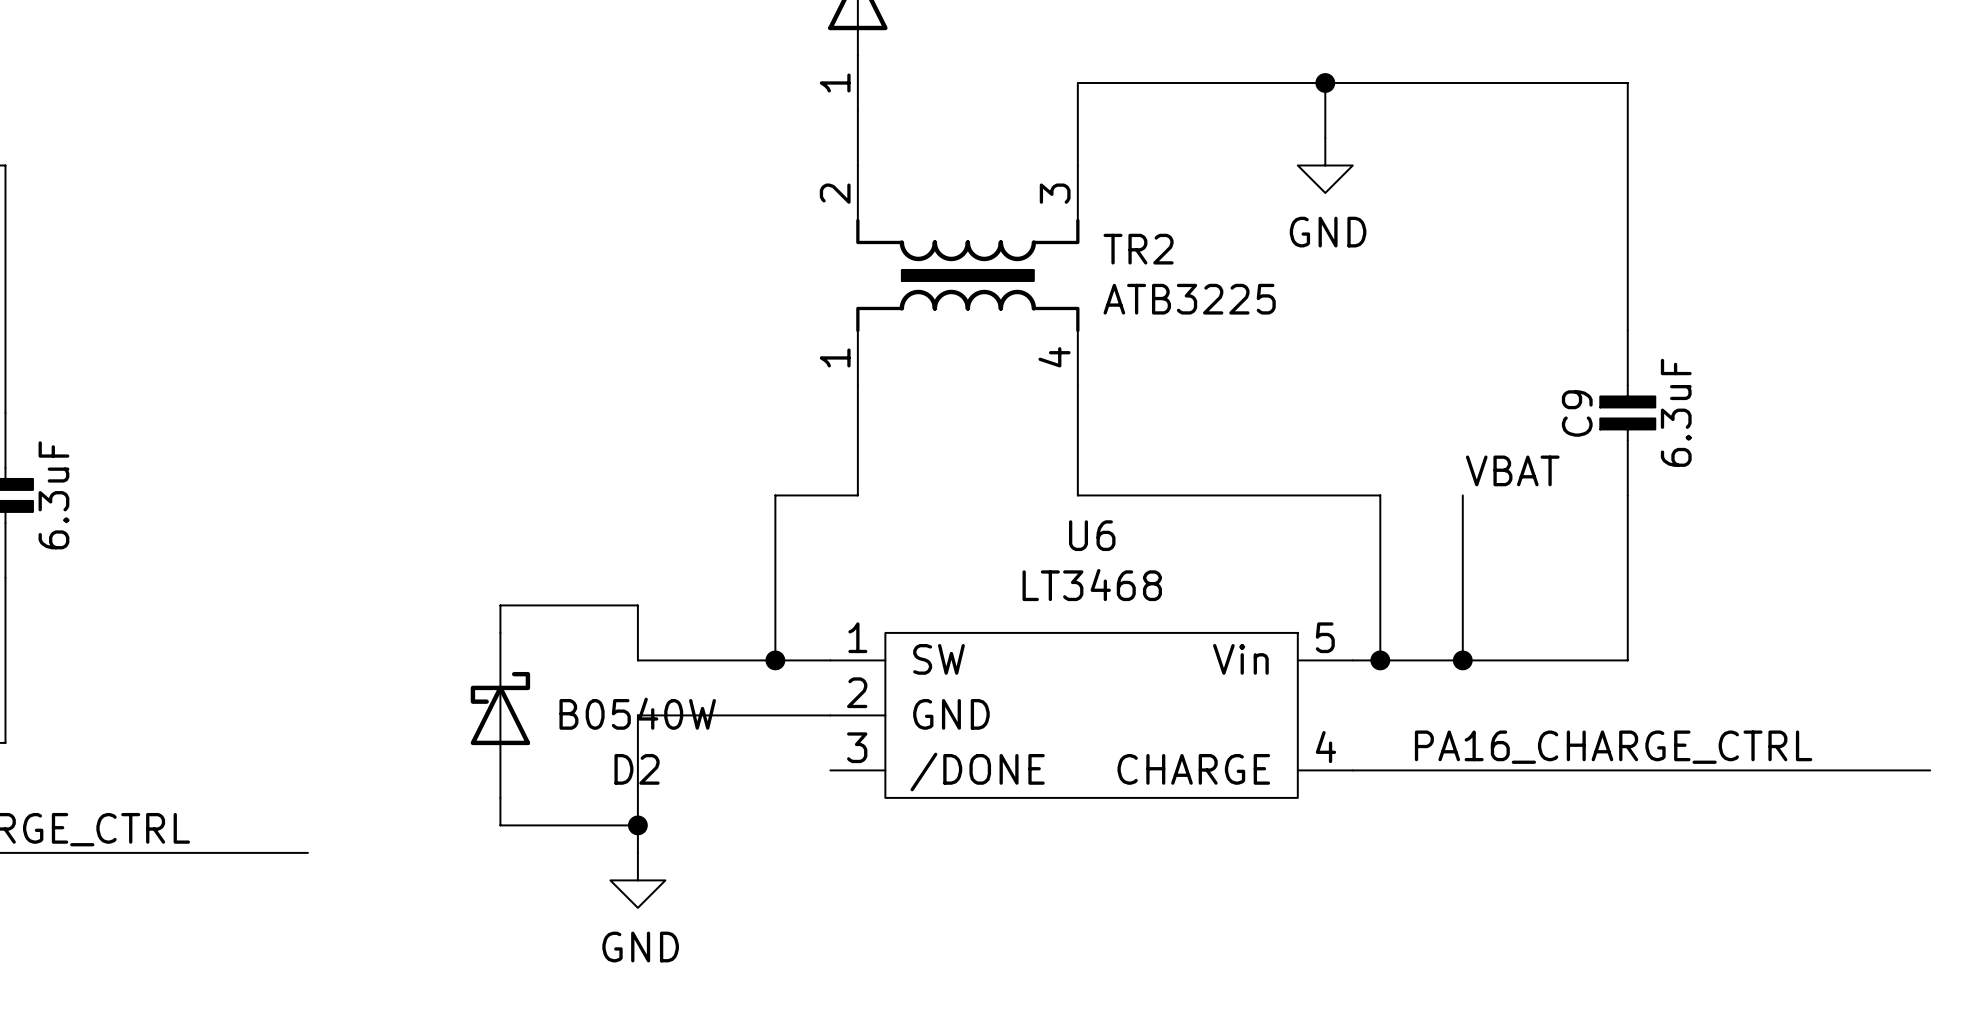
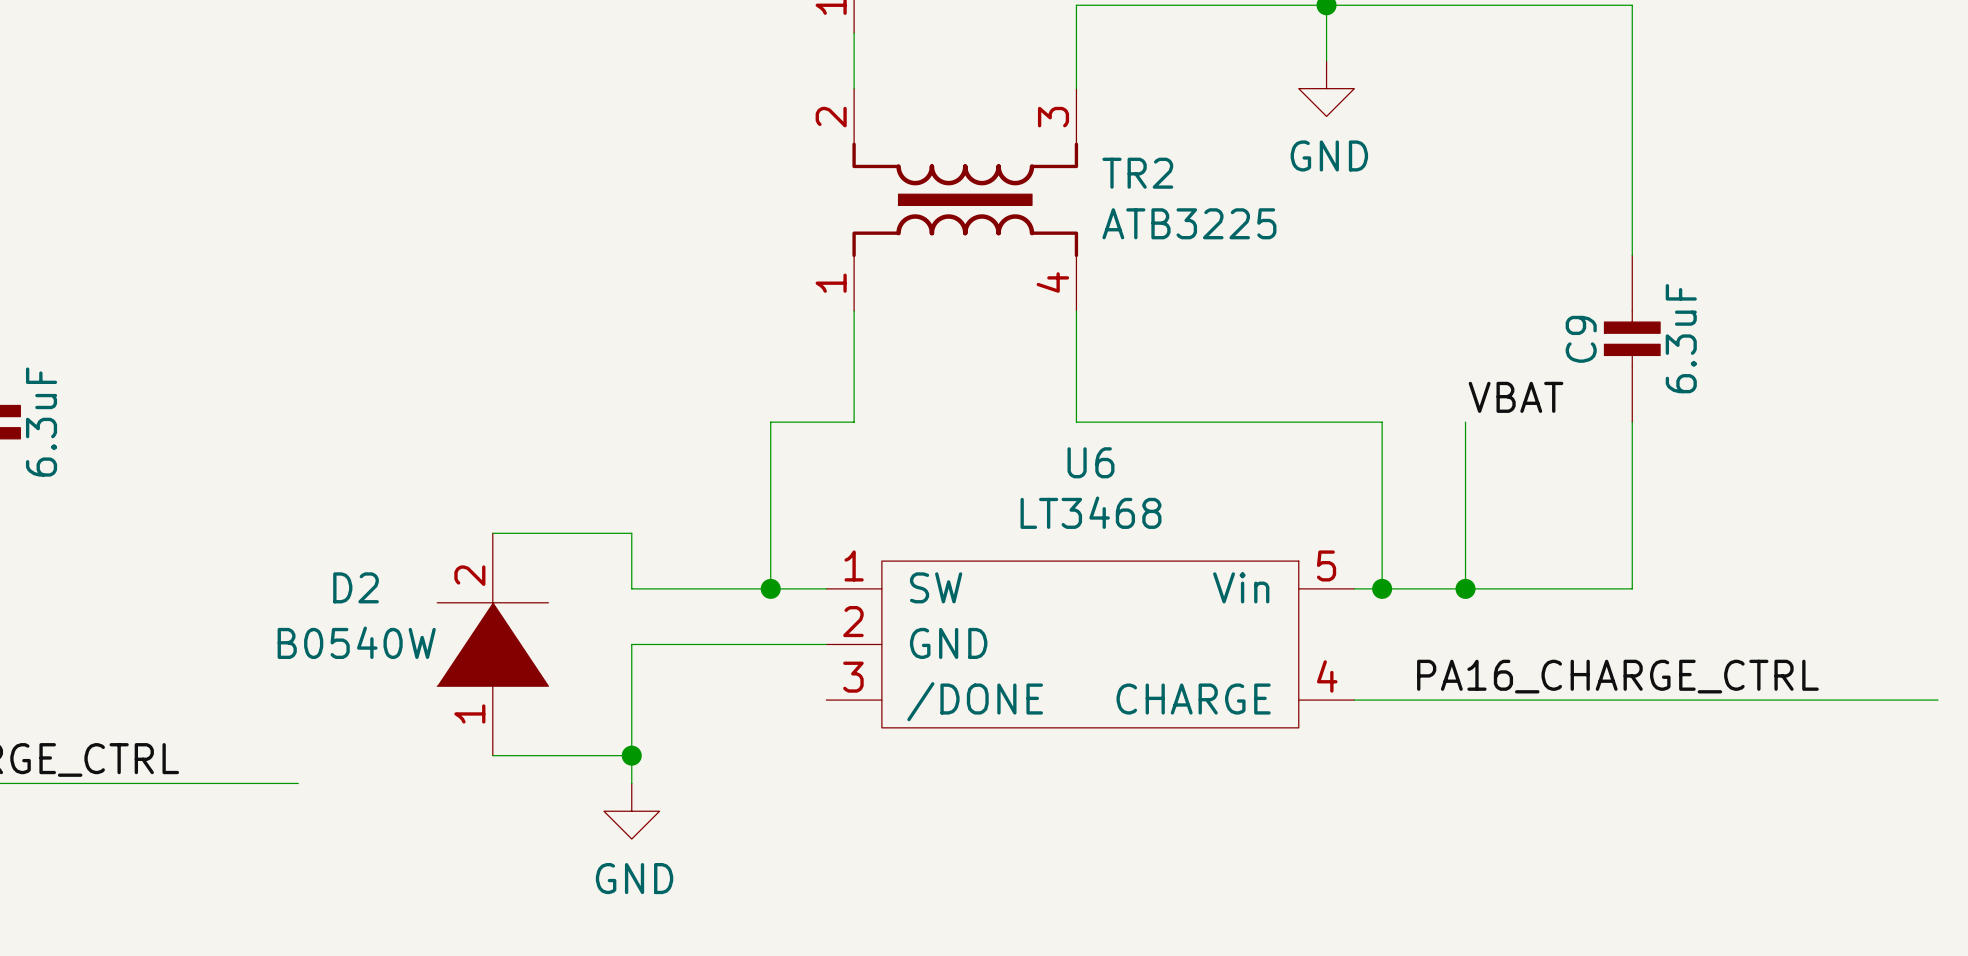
D2 symbol: [470, 632, 531, 798] -> [437, 533, 549, 756]
D2 value position: B0540W (637, 713) -> B0540W (356, 642)
D2 name position: D2 (637, 769) -> D2 (356, 587)

